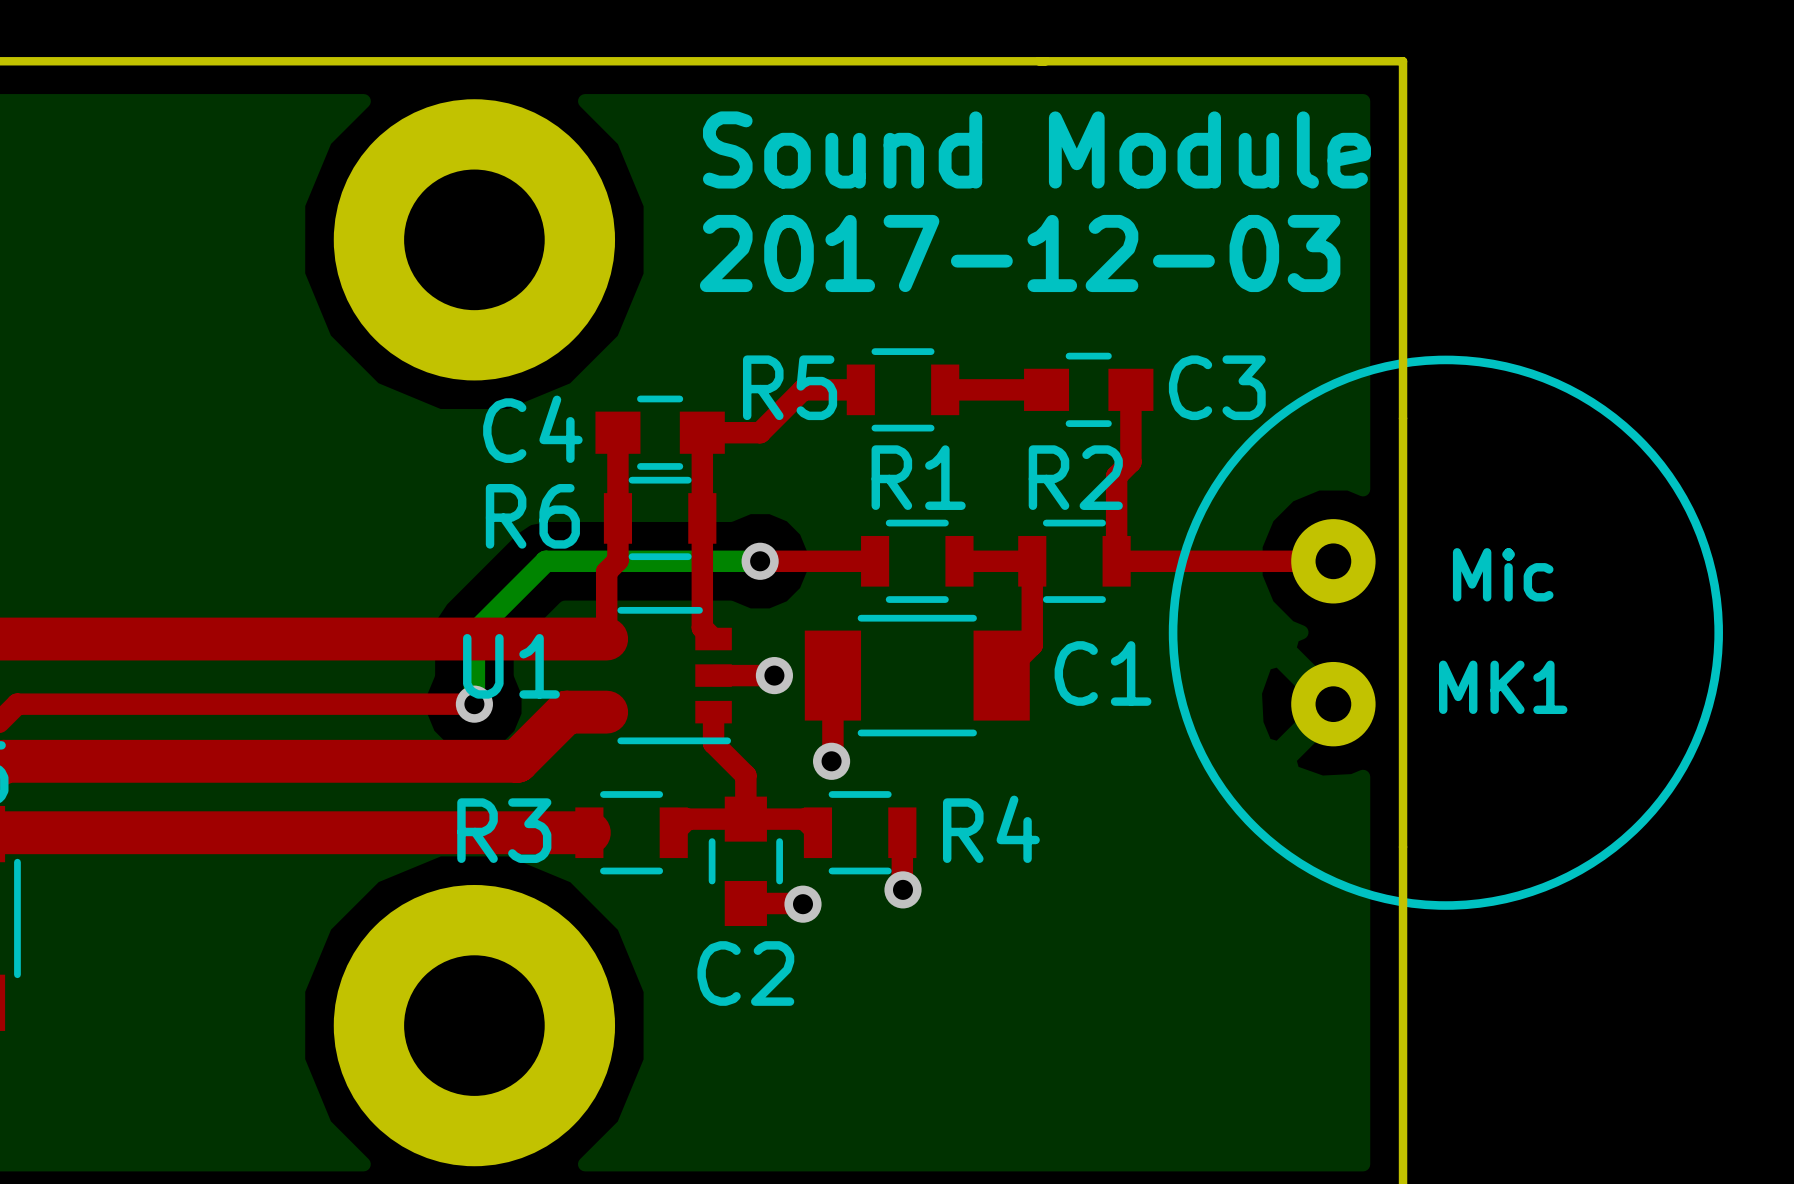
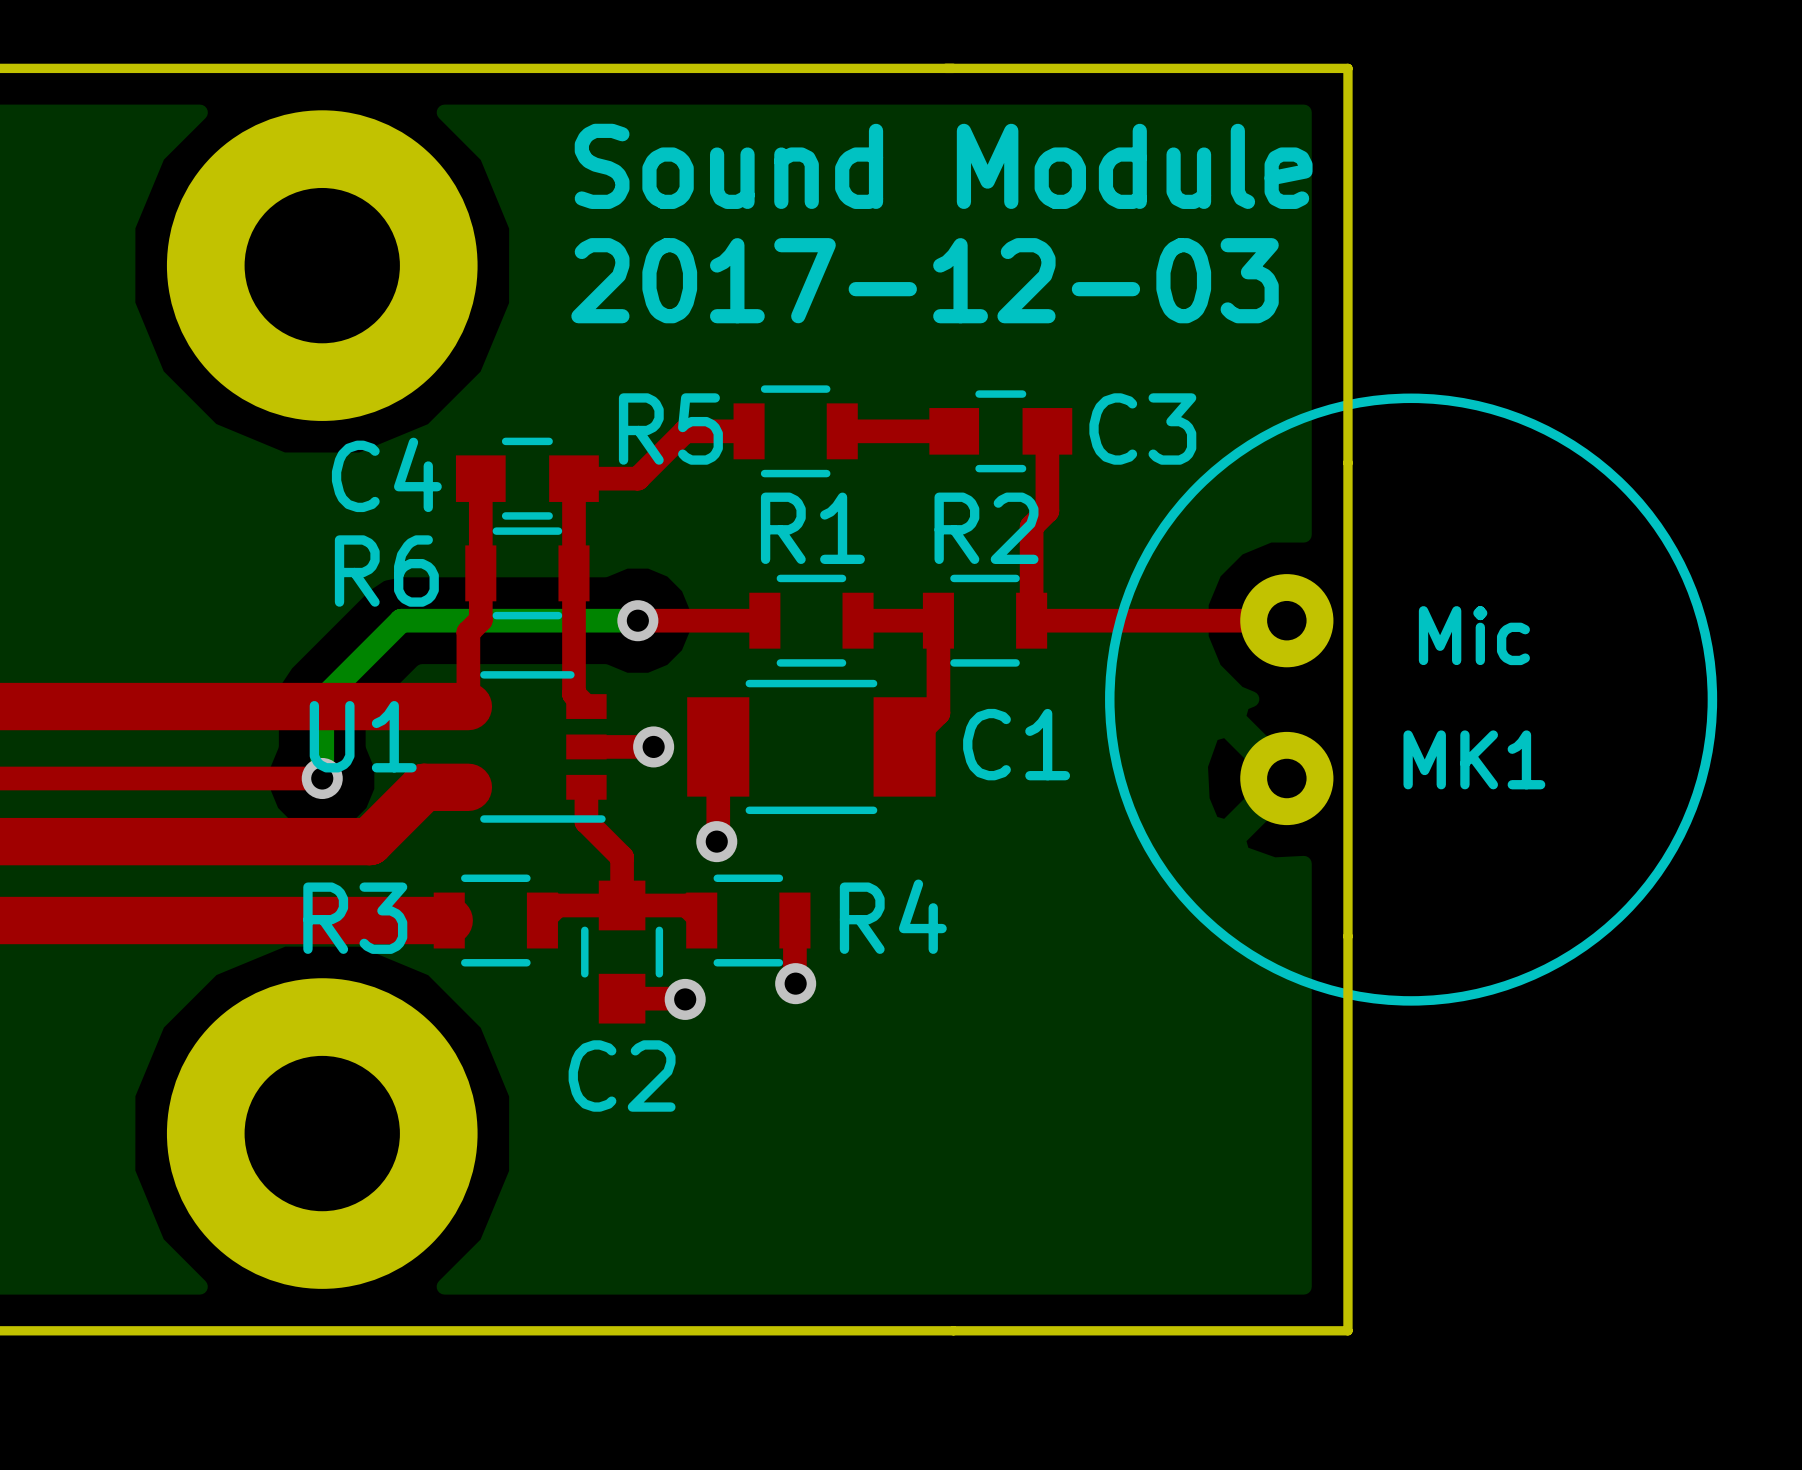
MK1 position: (1445, 632) -> (1411, 699)

